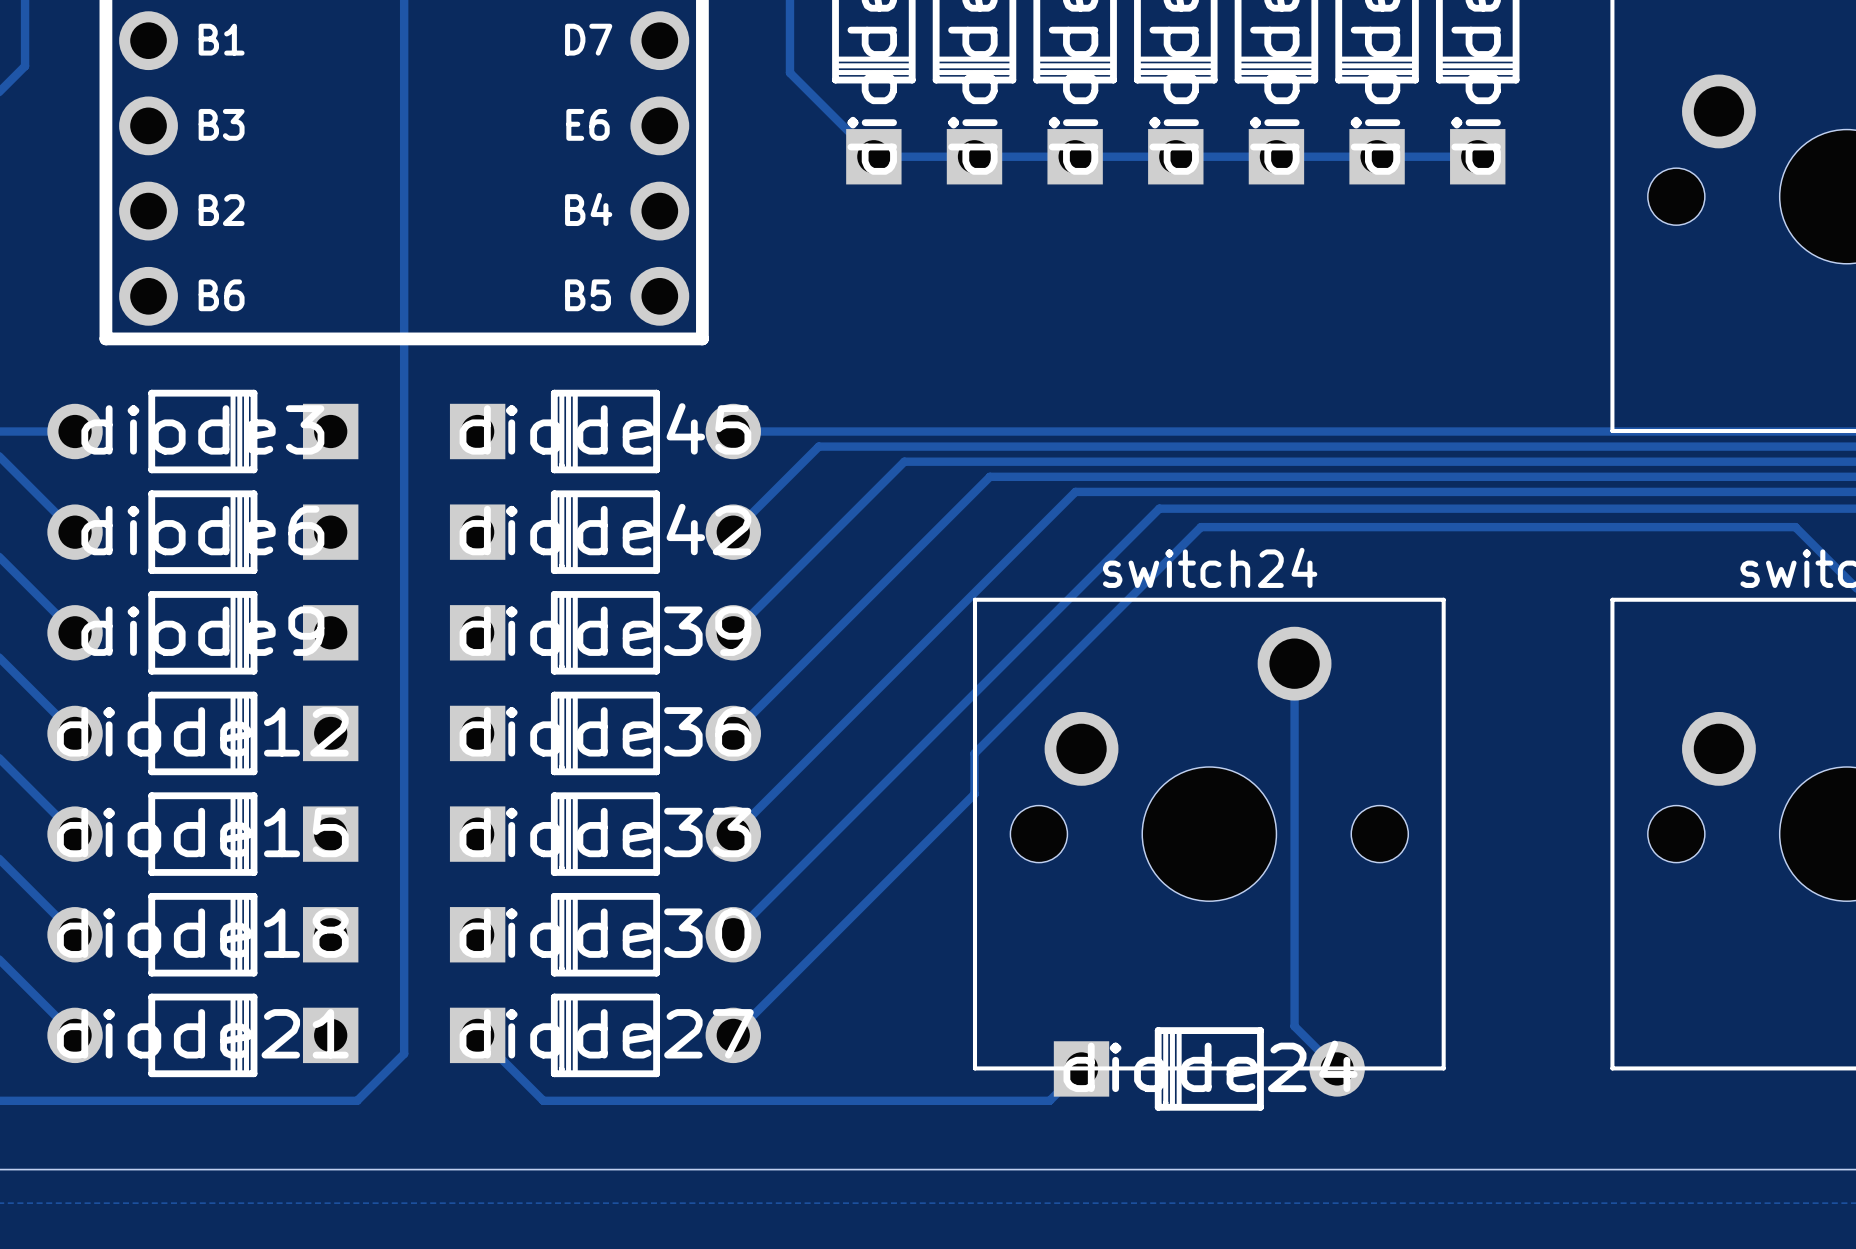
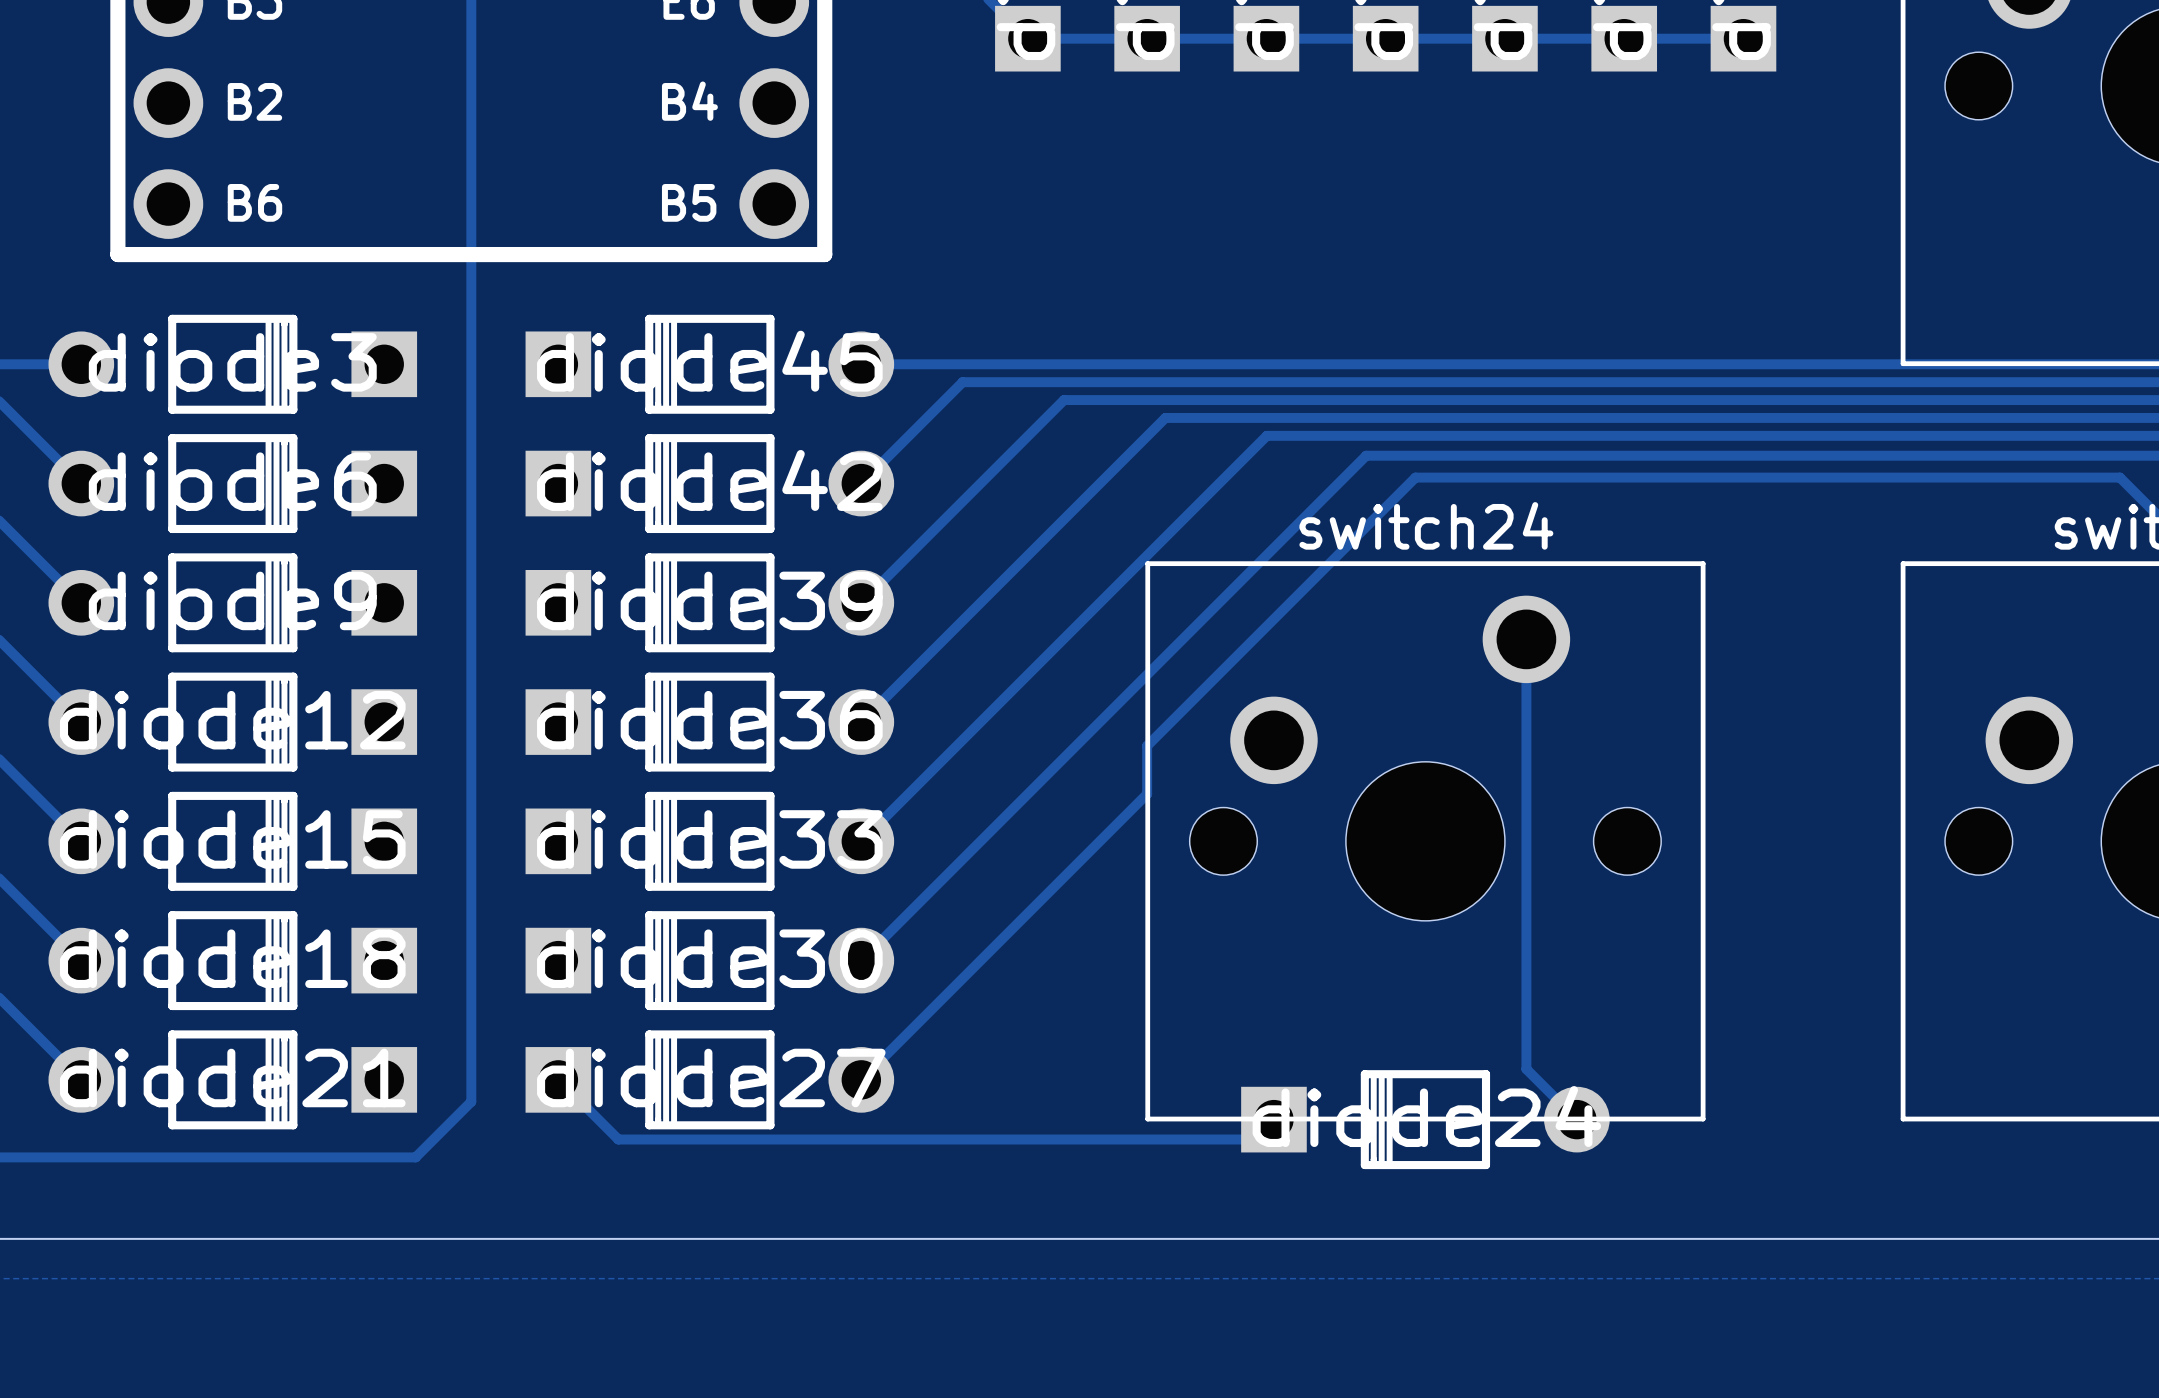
track: (528, 1085) (543, 1100) (1049, 1100) (1064, 1085) -> (618, 1139) (1254, 1139)

